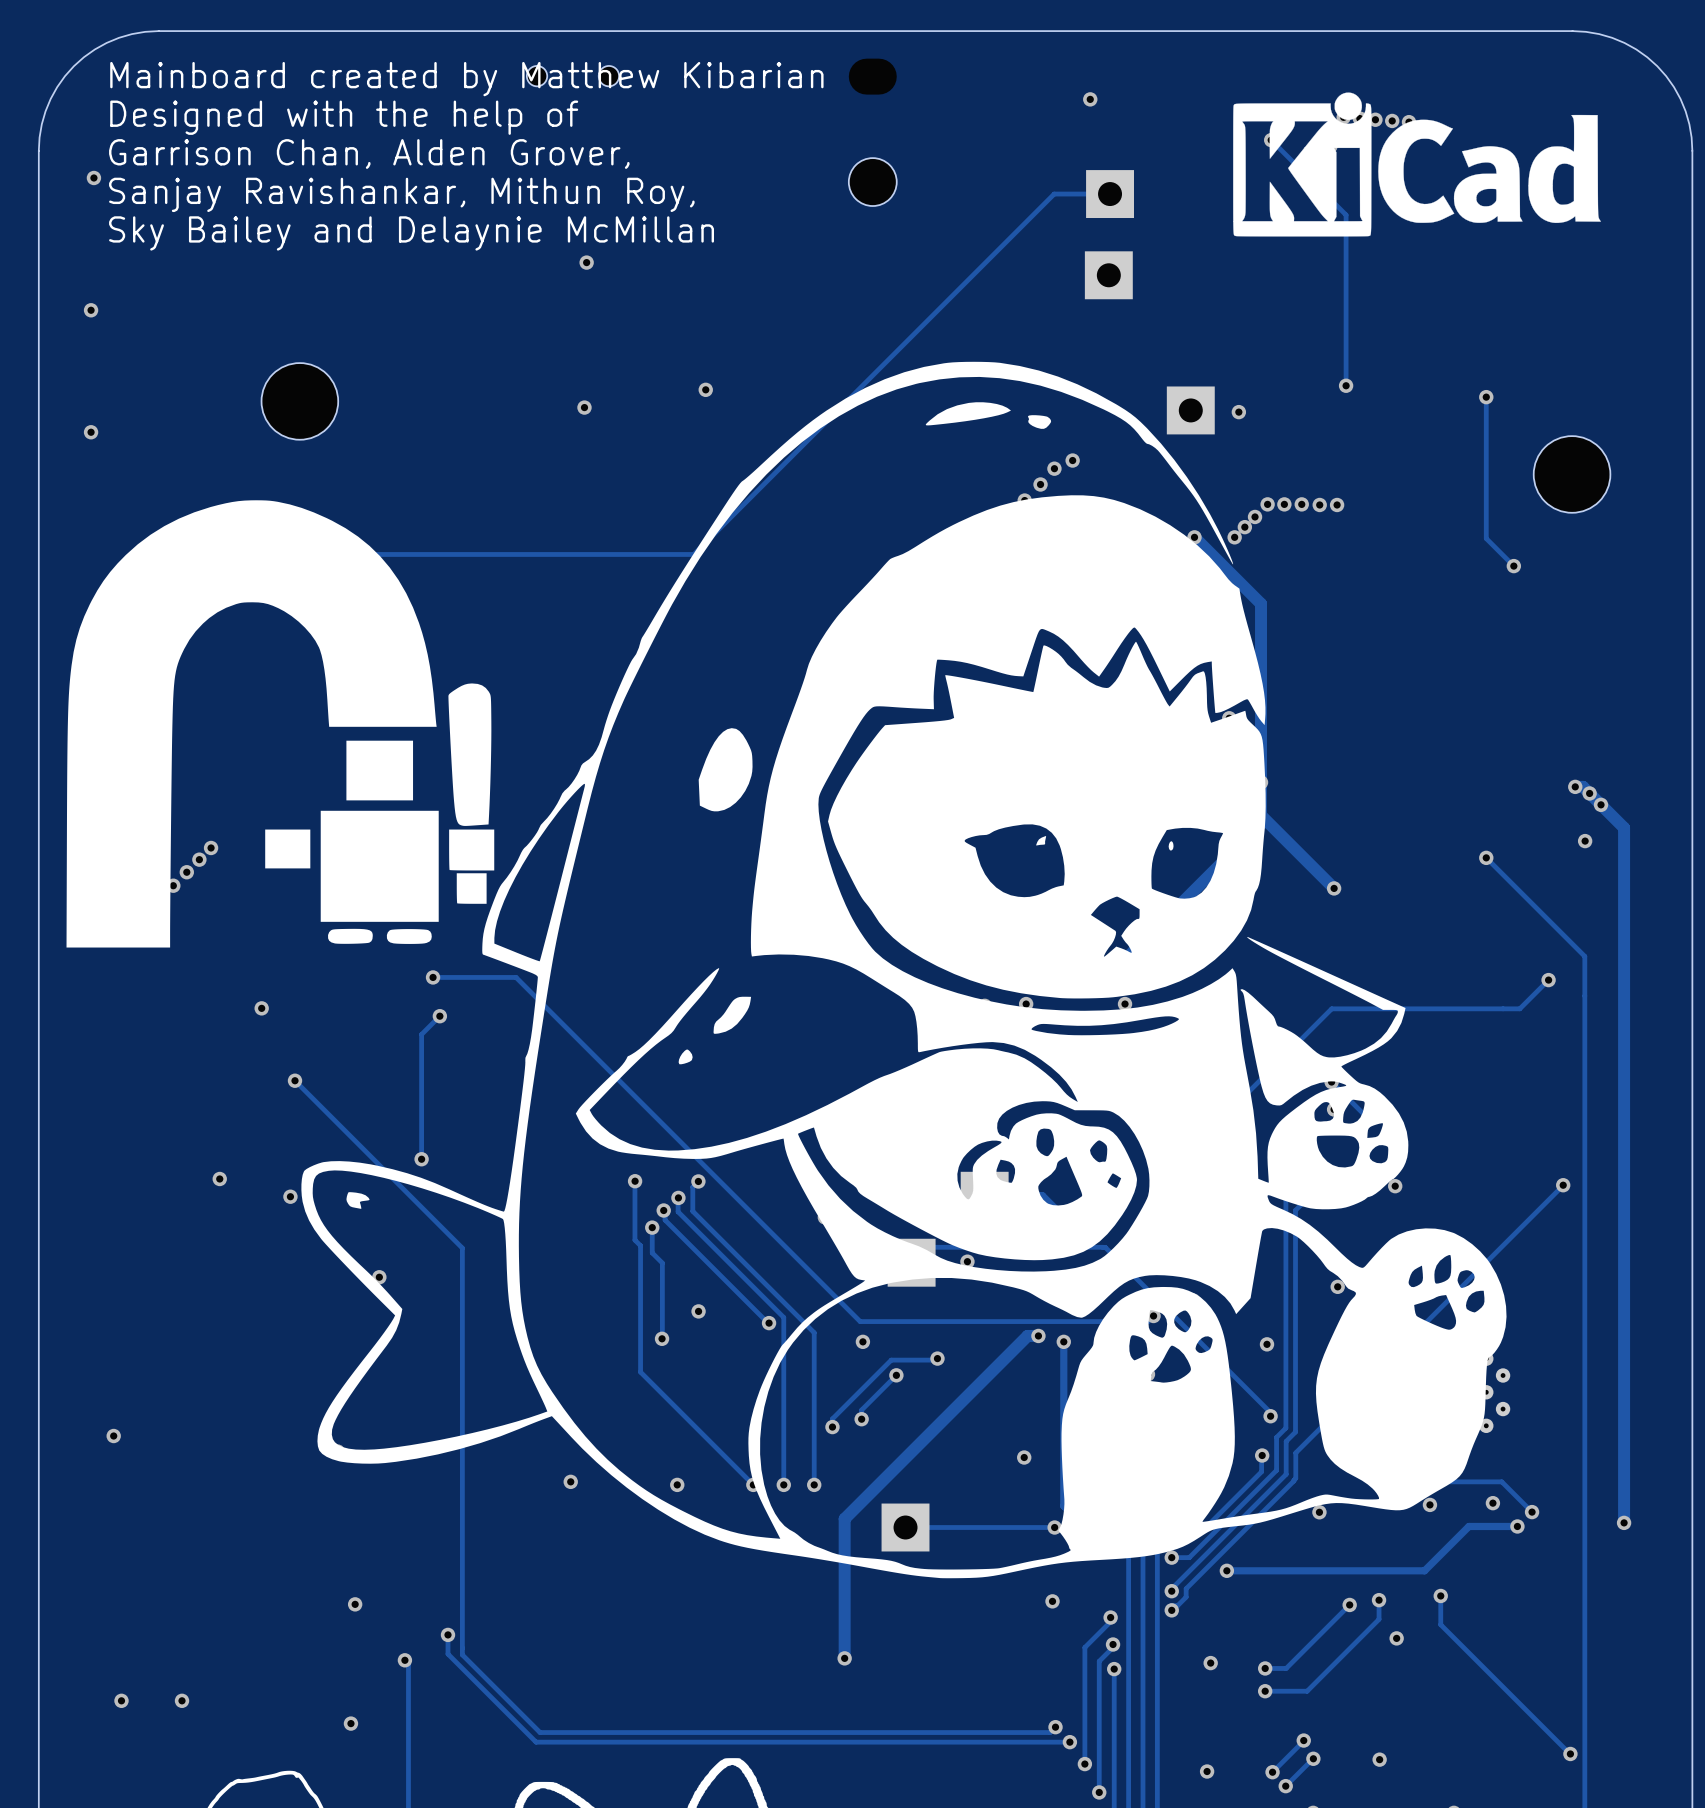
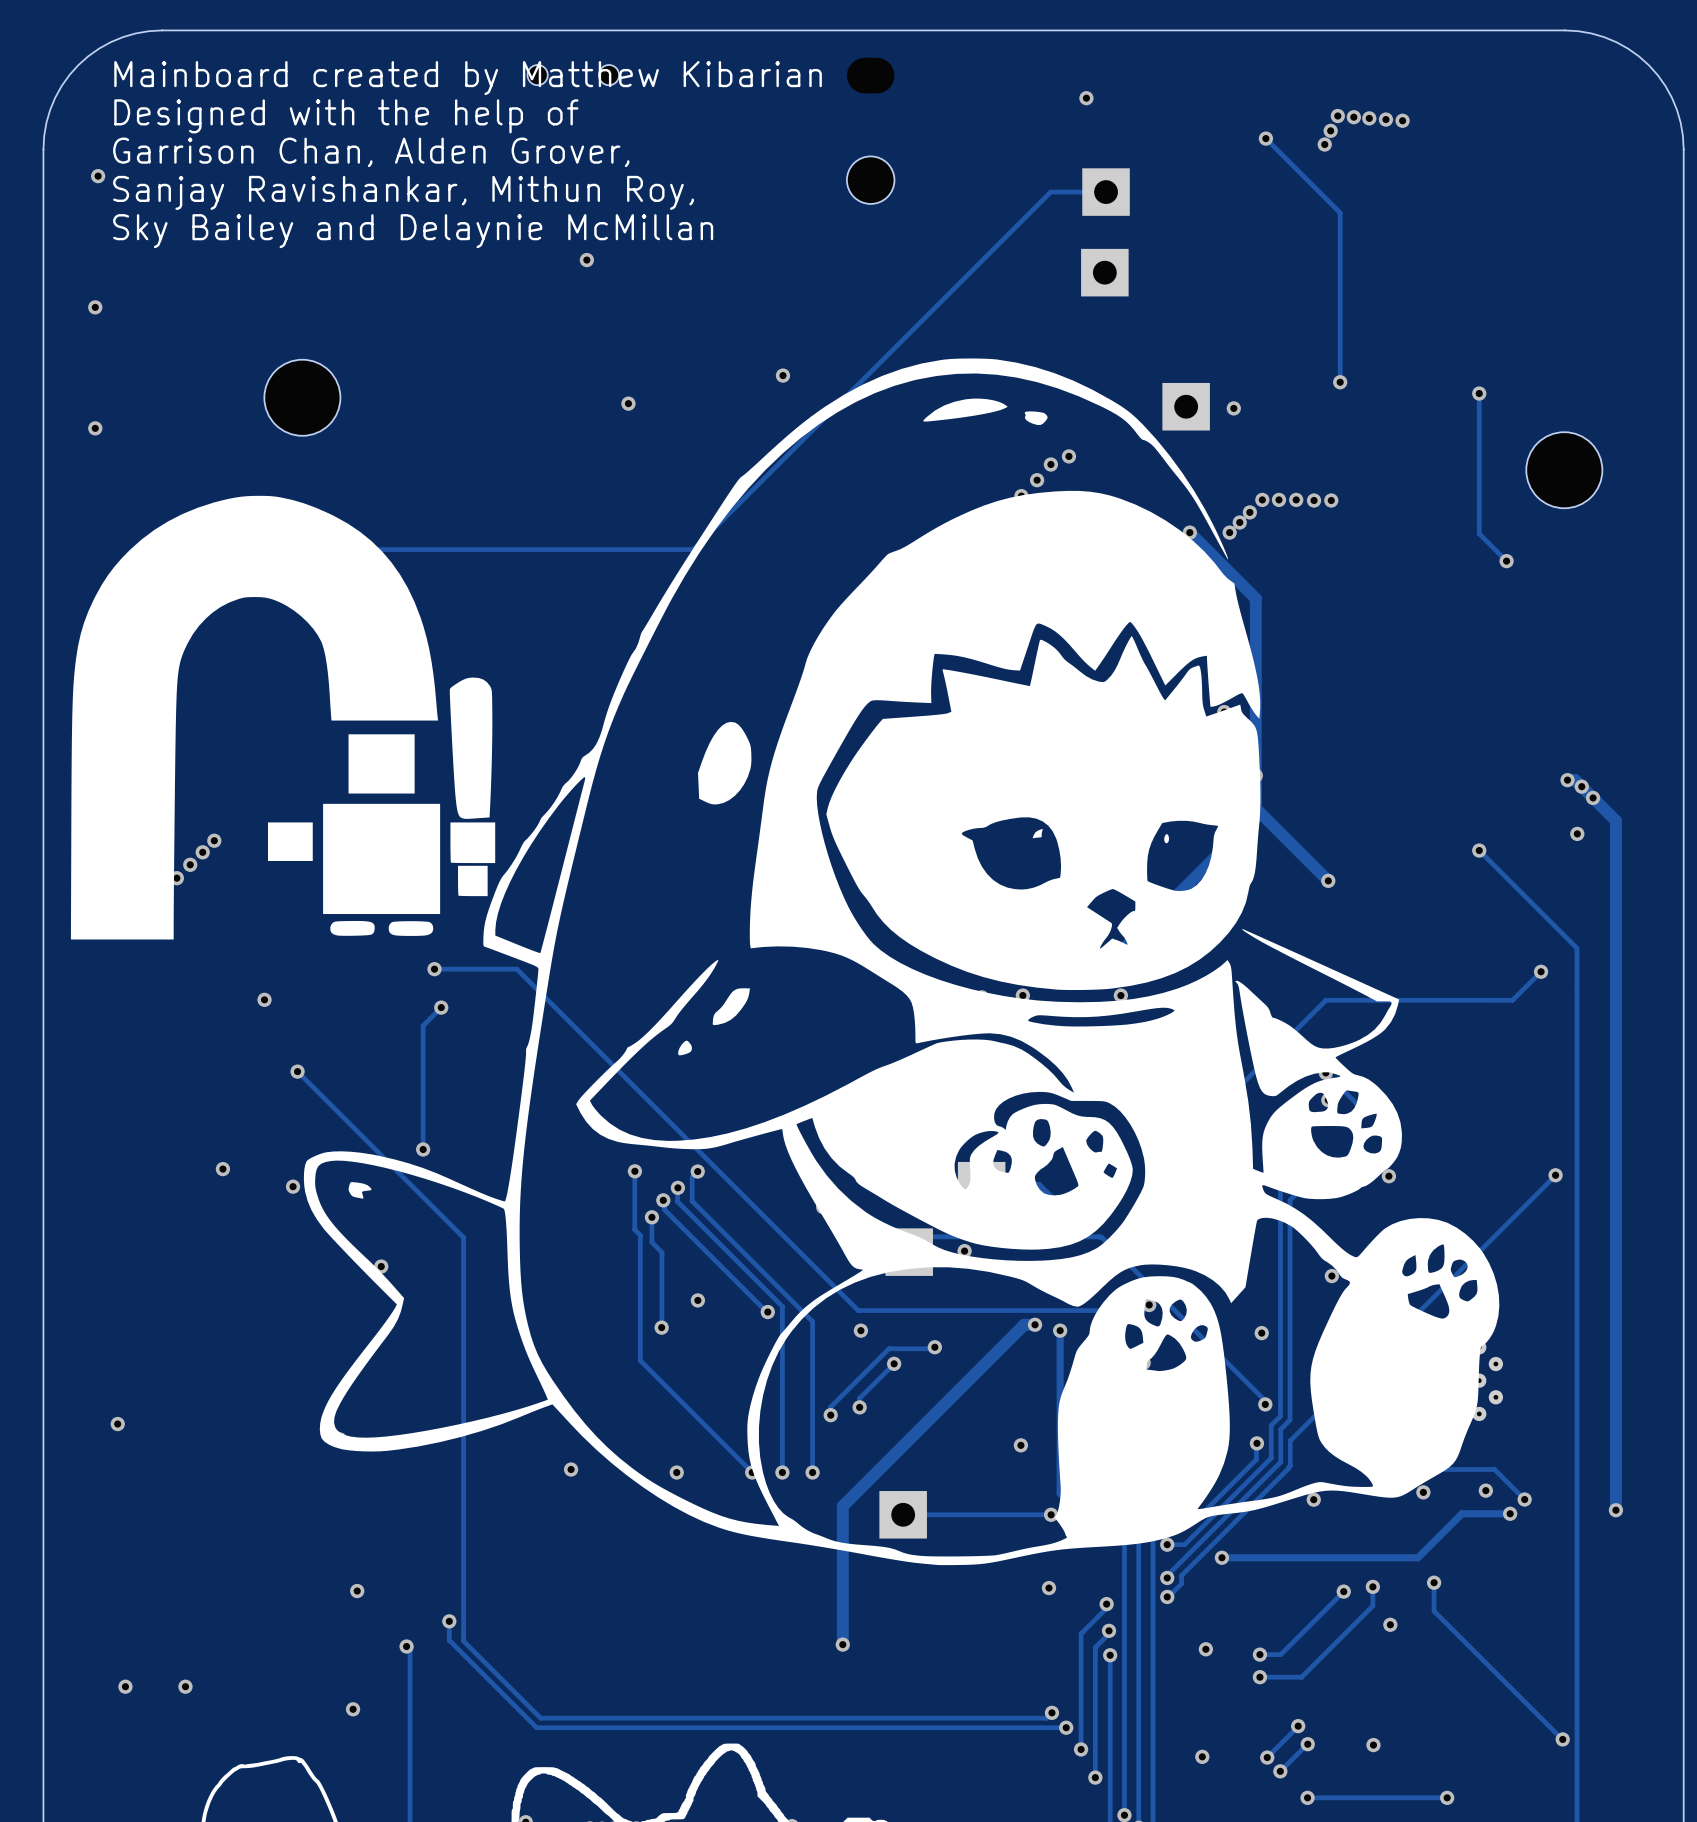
drawing: [1233, 92, 1601, 237] -> none
via: none -> (782, 375)
via: (705, 389) -> none
via: (584, 407) -> none
via: none -> (628, 403)

